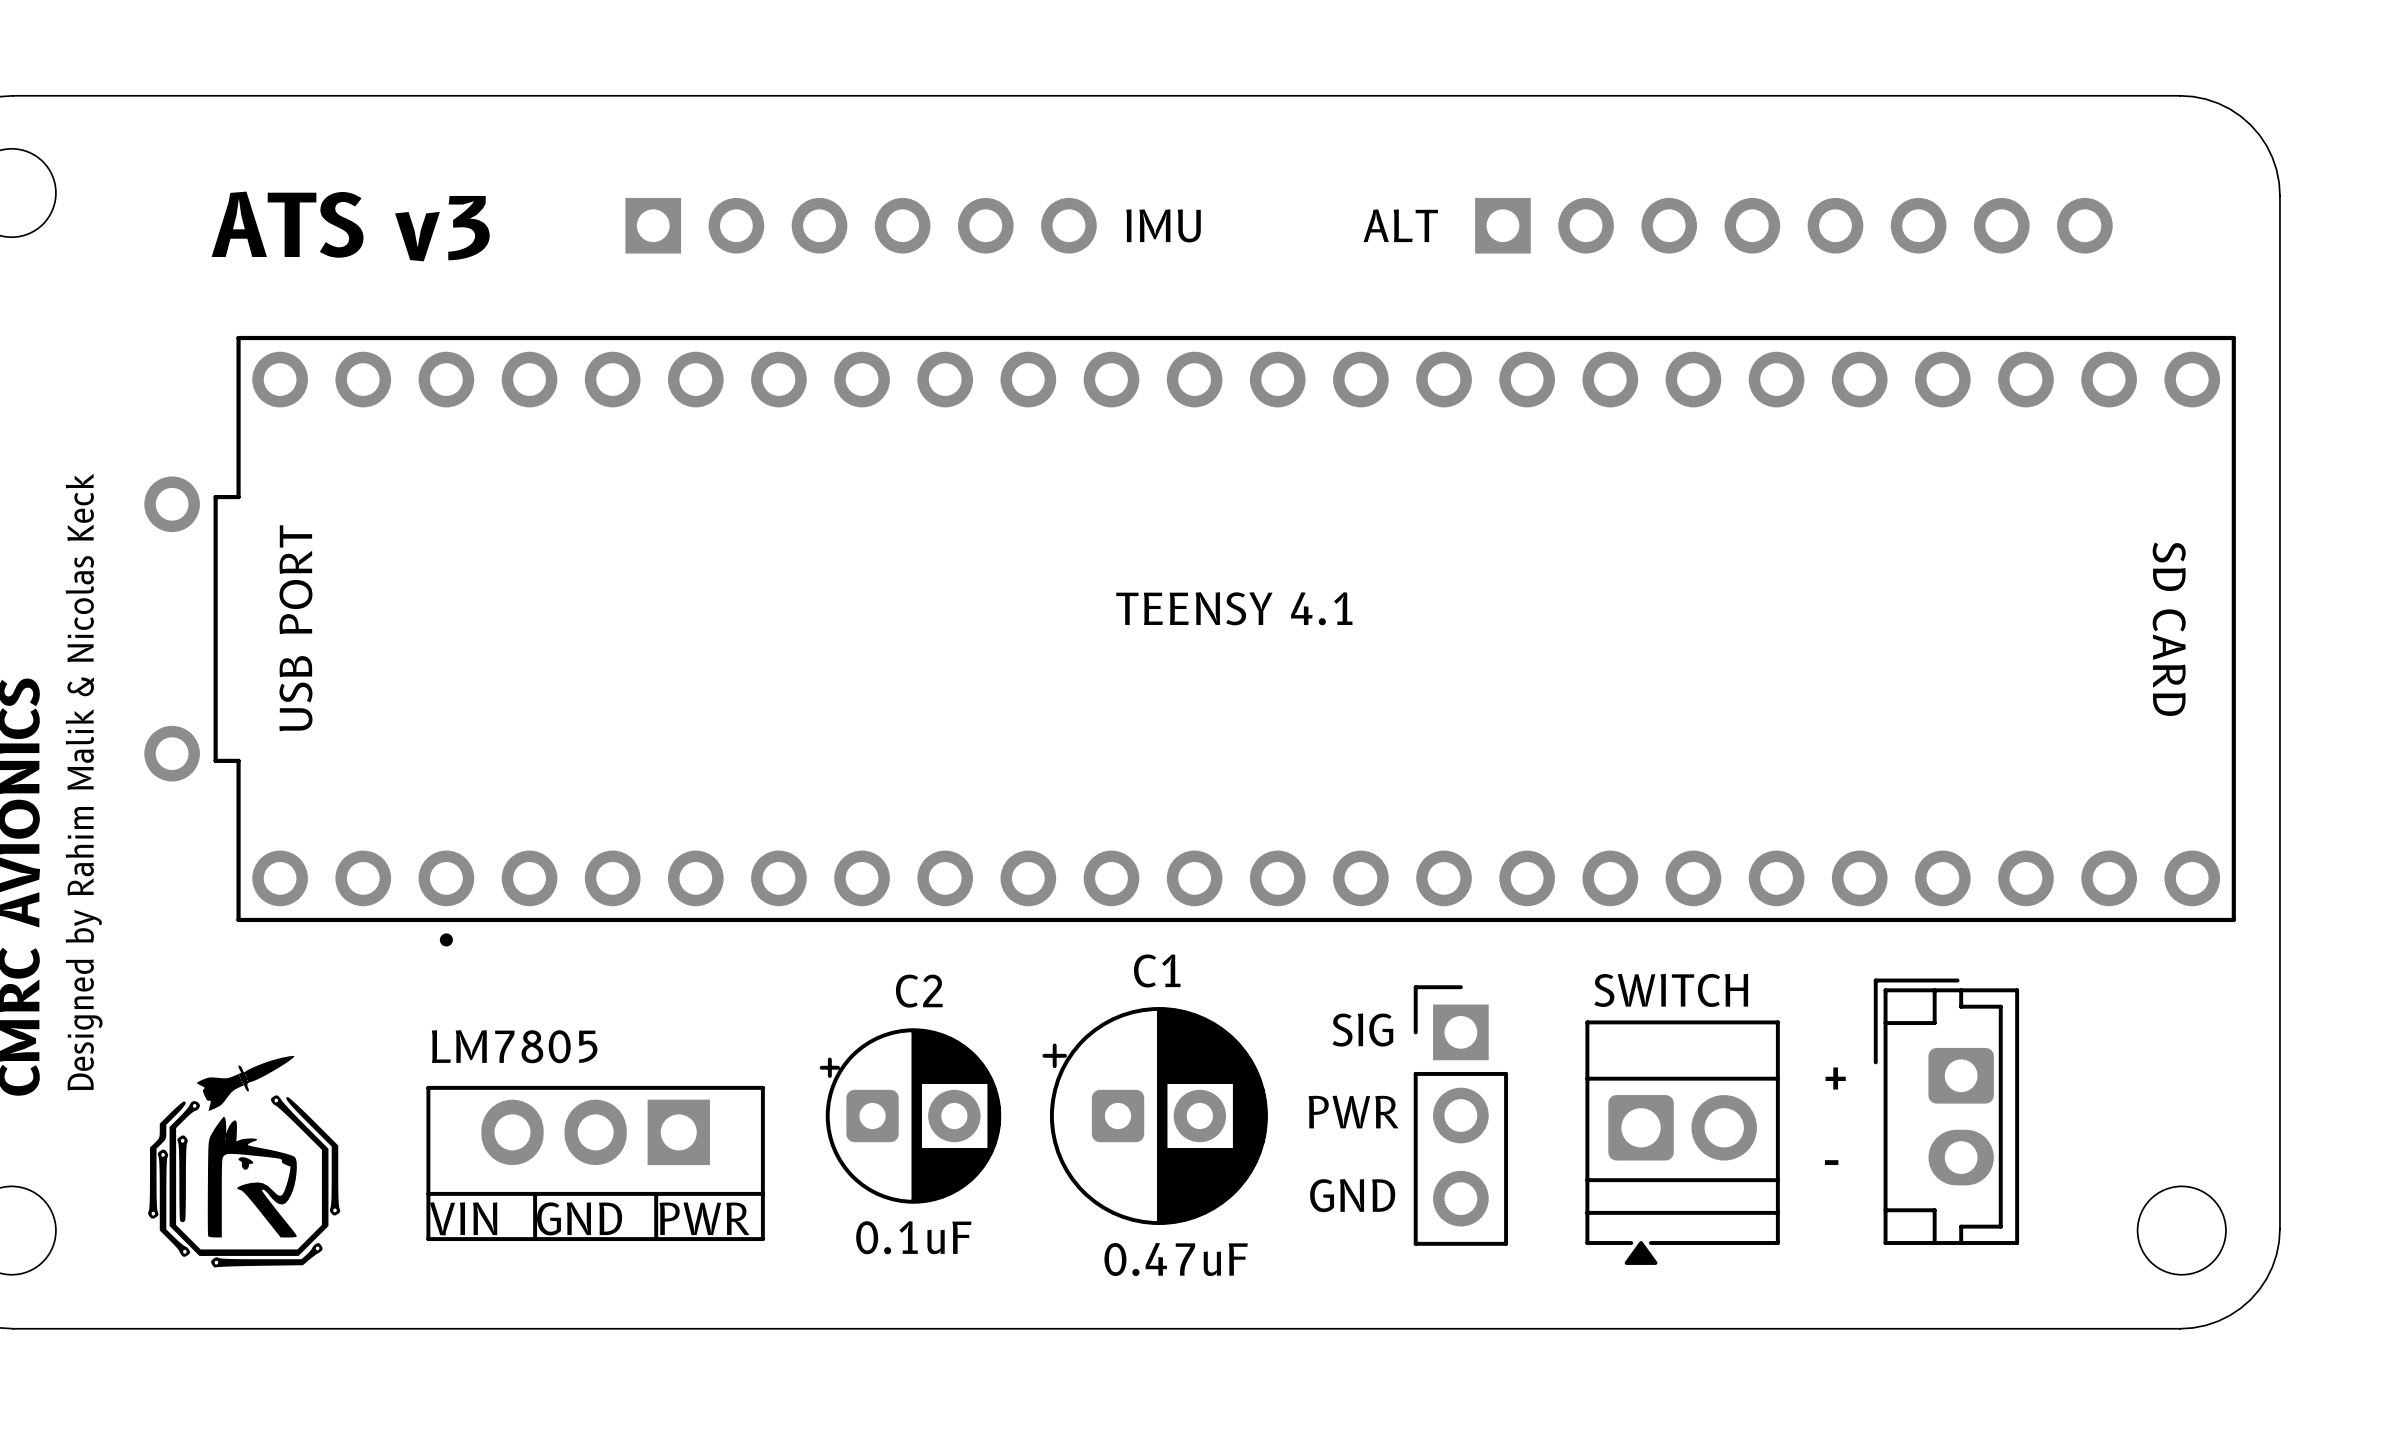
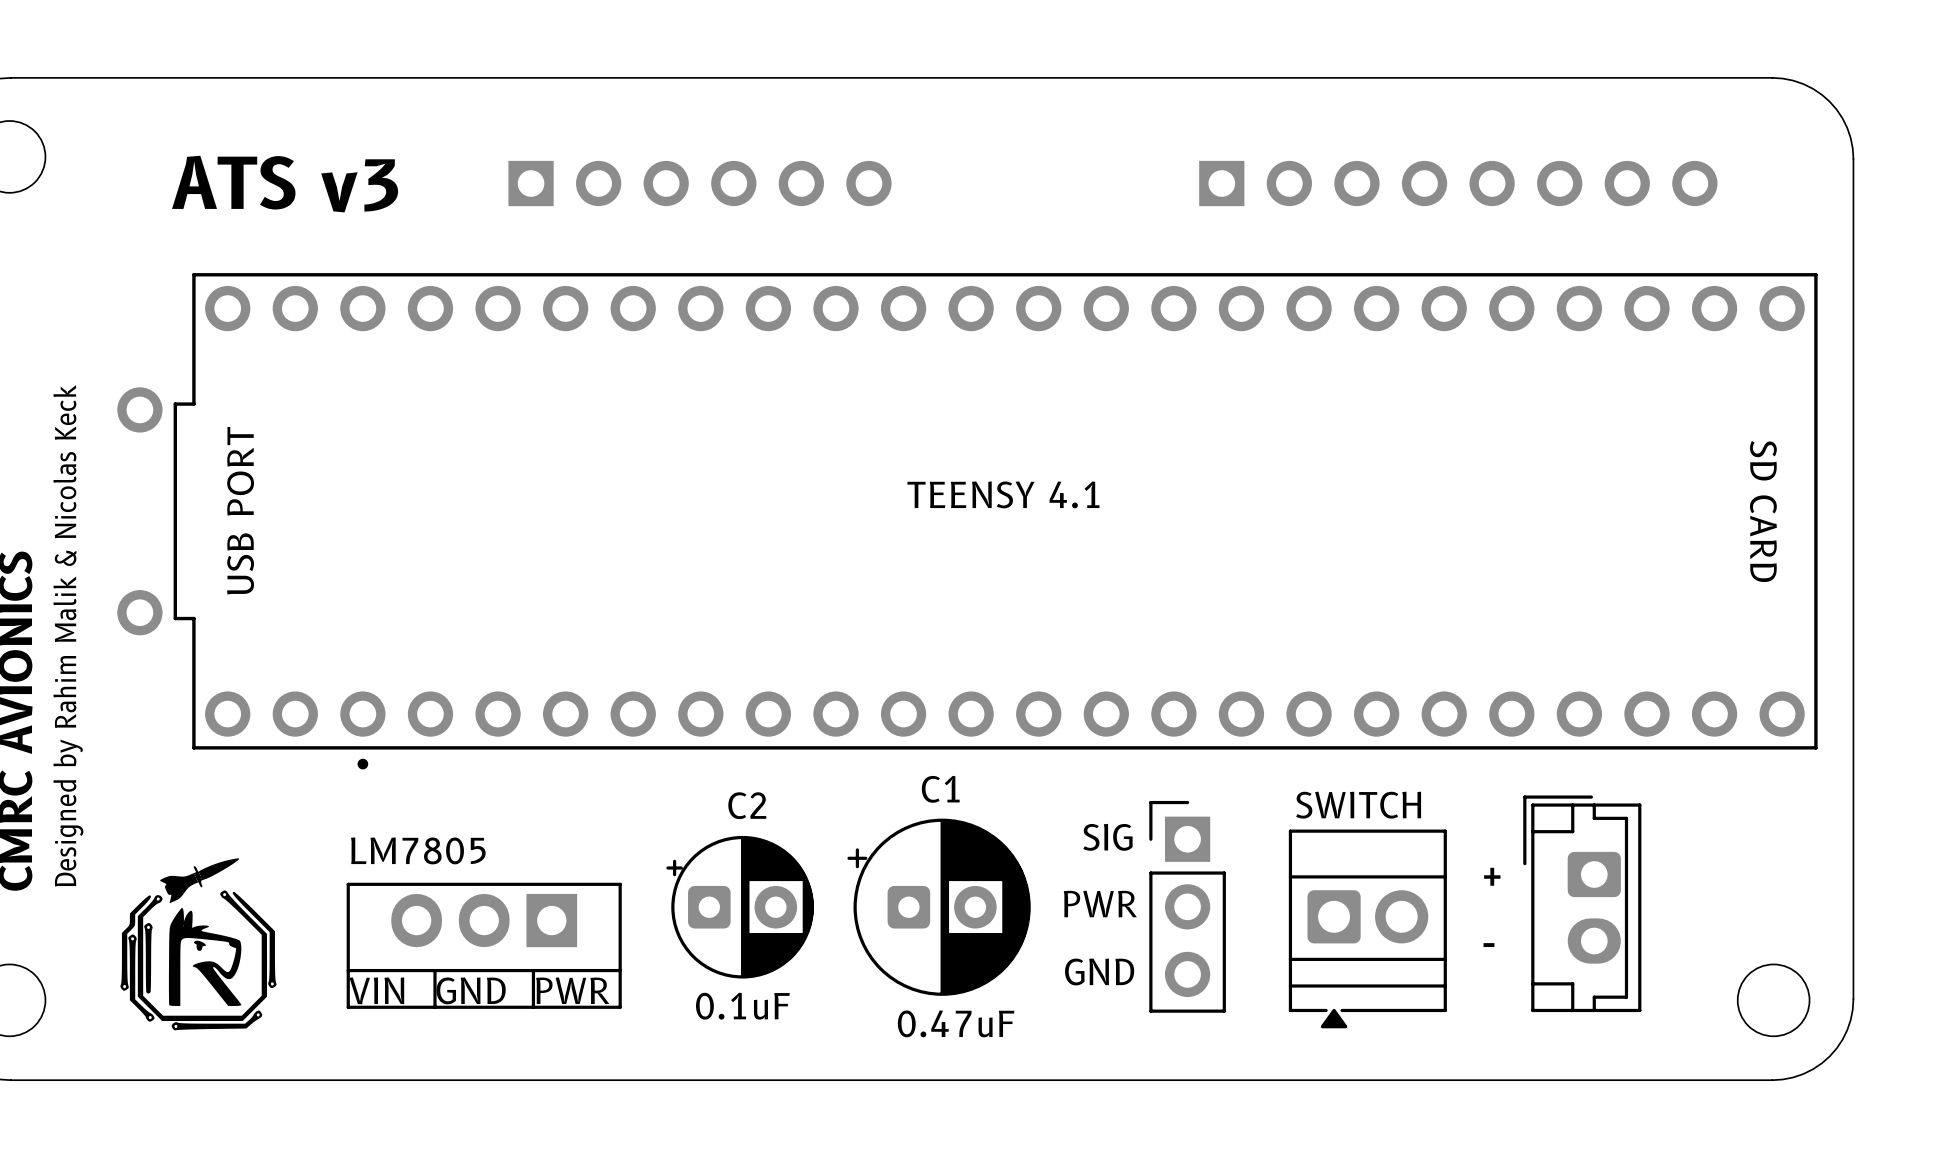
text: IMU (1163, 225) -> none
text: ALT (1400, 225) -> none

